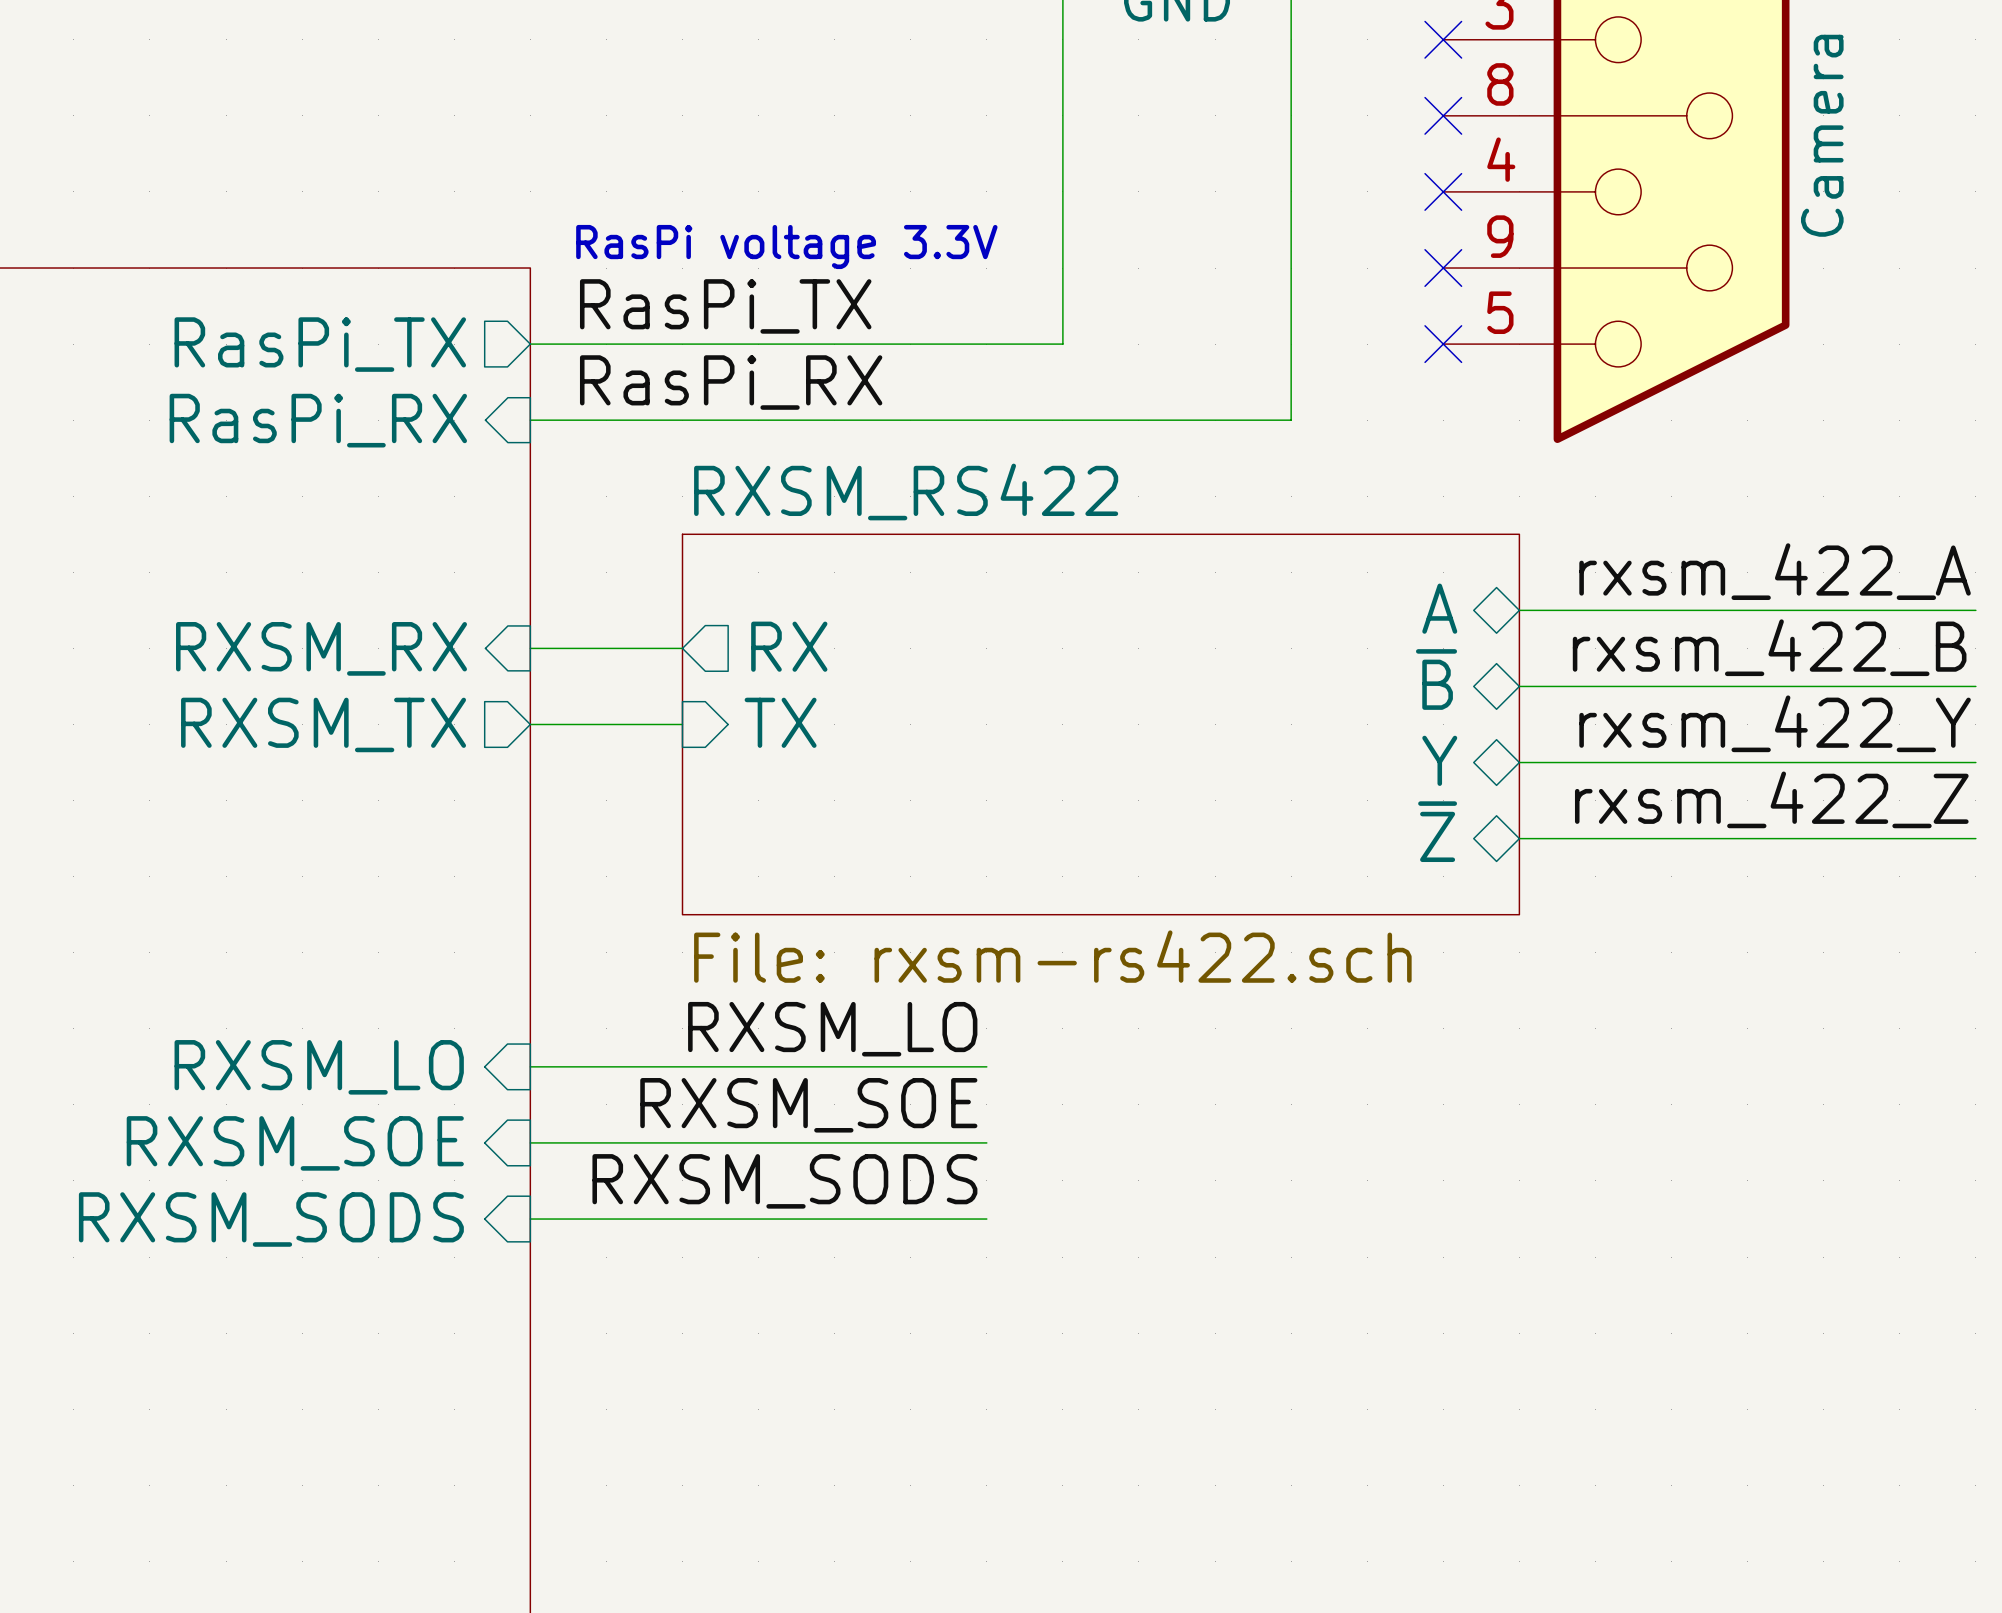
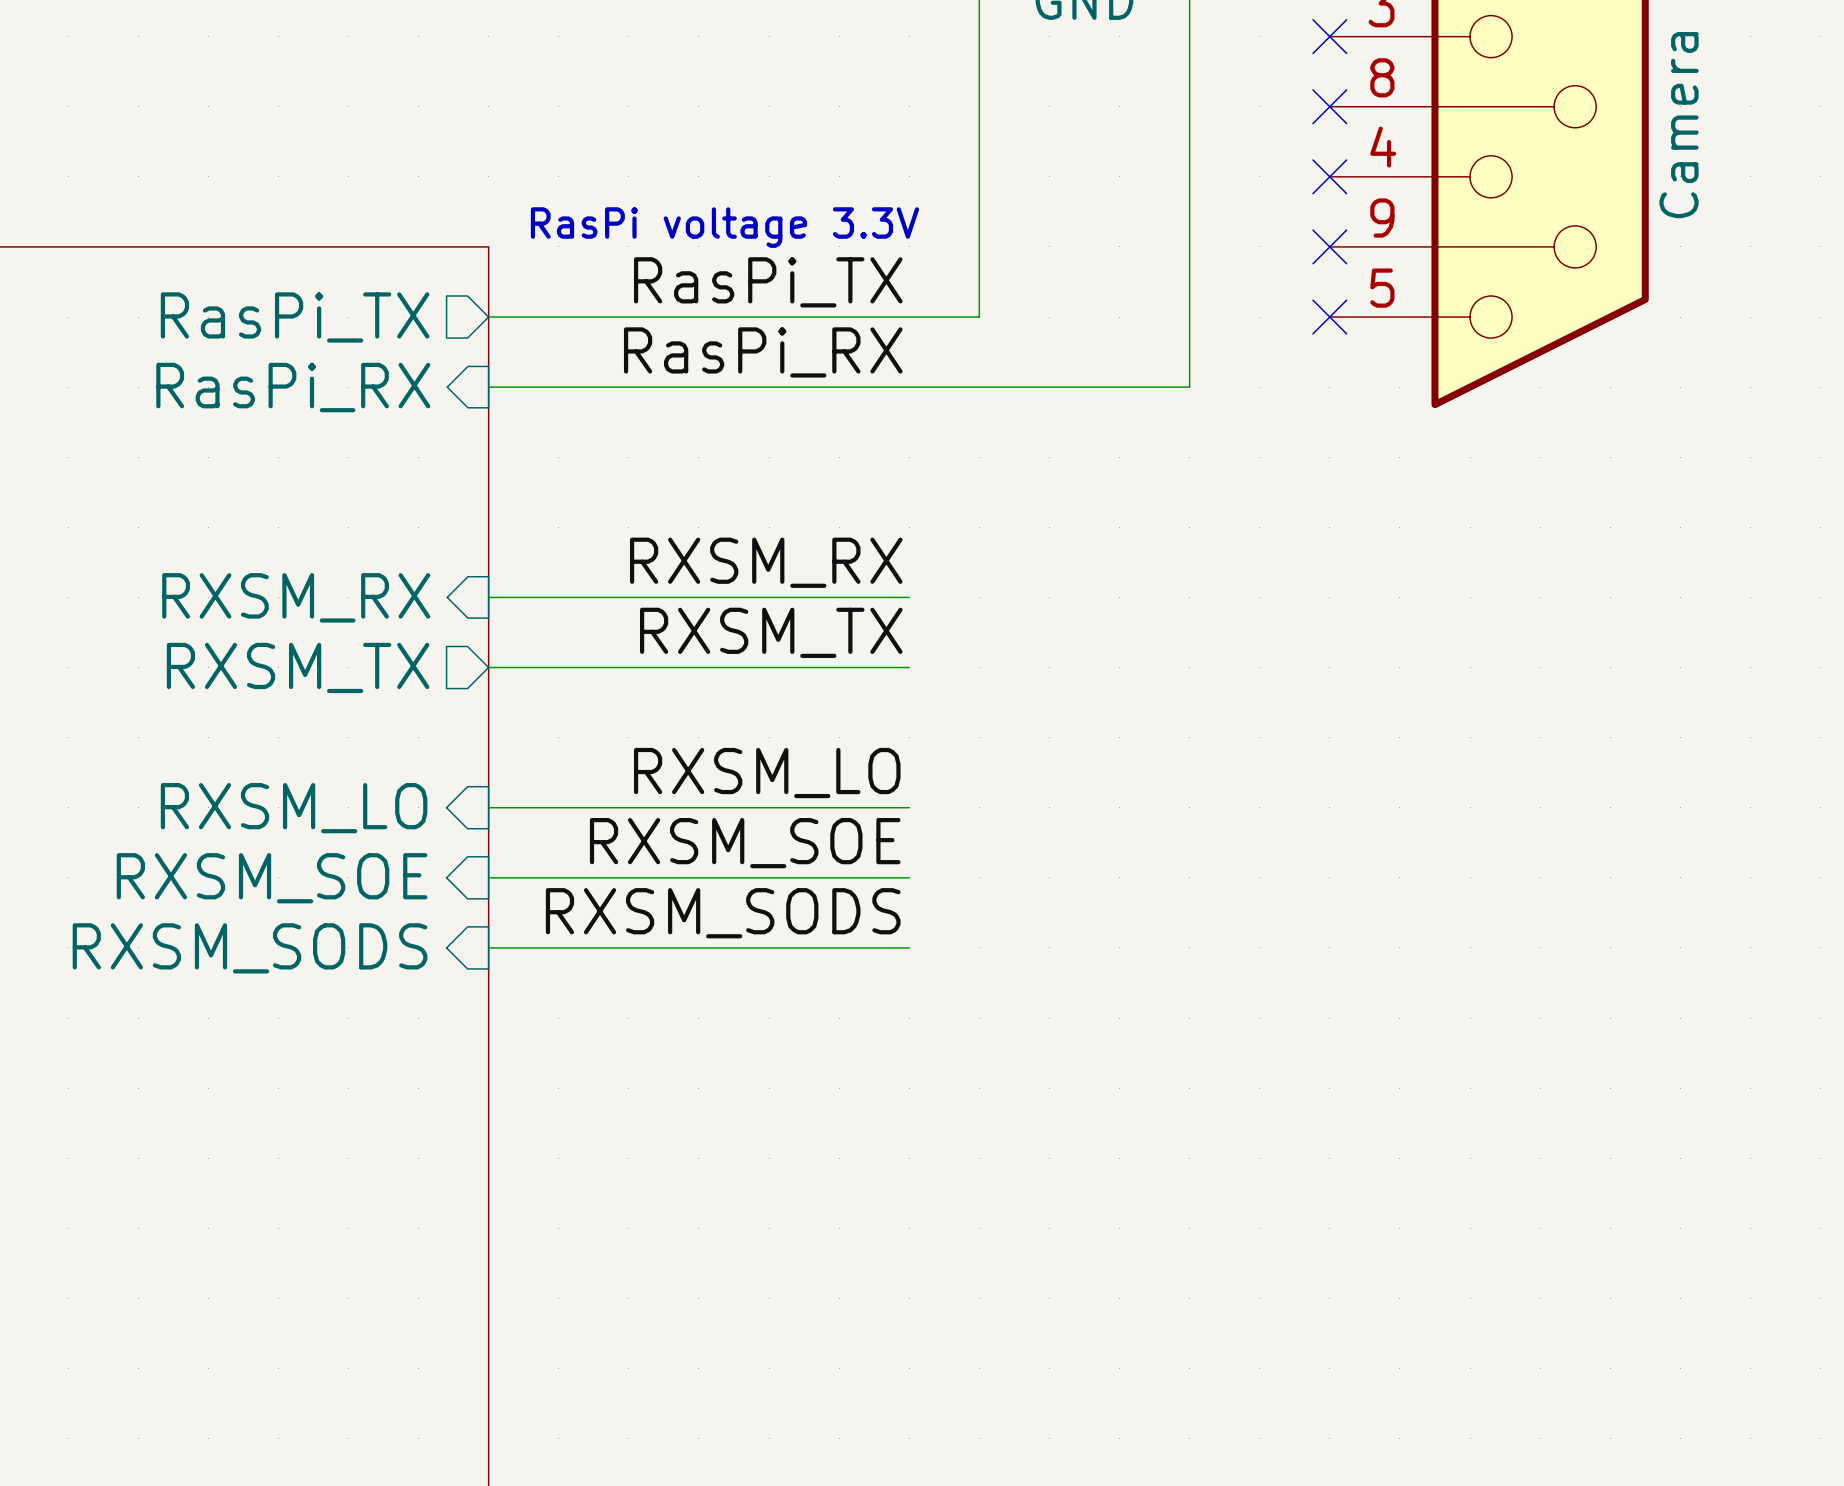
label position: RasPi_TX (725, 306) -> RasPi_TX (768, 282)
label position: RasPi_RX (731, 382) -> RasPi_RX (763, 352)
label: rxsm_422_A (1775, 571) -> none
sheet pin: A (1439, 608) -> none
label: none -> RXSM_RX (766, 562)
wire: (1519, 610) (1975, 610) -> none
sheet pin: RX (789, 646) -> none
label: rxsm_422_B (1769, 647) -> none
wire: none -> (628, 597) (909, 597)
sheet pin: ~{B} (1436, 679) -> none
label: none -> RXSM_TX (771, 632)
wire: (1519, 686) (1975, 686) -> none
sheet pin: TX (780, 722) -> none
label: rxsm_422_Y (1775, 723) -> none
wire: none -> (628, 667) (909, 667)
sheet RXSM_RS422: File: rxsm-rs422.sch (1100, 724) -> none
sheet pin: Y (1439, 760) -> none
wire: (1519, 762) (1975, 762) -> none
label: rxsm_422_Z (1771, 799) -> none
sheet pin: ~{Z} (1437, 831) -> none
wire: (1519, 838) (1975, 838) -> none
label position: RXSM_LO (832, 1029) -> RXSM_LO (767, 773)
wire: (530, 1066) (986, 1066) -> (488, 807) (909, 807)
sheet pin position: RXSM_LO (319, 1067) -> RXSM_LO (294, 808)
label position: RXSM_SOE (808, 1105) -> RXSM_SOE (745, 843)
wire: (530, 1142) (986, 1142) -> (488, 877) (909, 877)
sheet pin position: RXSM_SOE (295, 1143) -> RXSM_SOE (272, 878)
label position: RXSM_SODS (784, 1181) -> RXSM_SODS (723, 913)
sheet pin position: RXSM_SODS (271, 1219) -> RXSM_SODS (250, 948)
wire: (530, 1219) (986, 1219) -> (488, 947) (909, 947)

